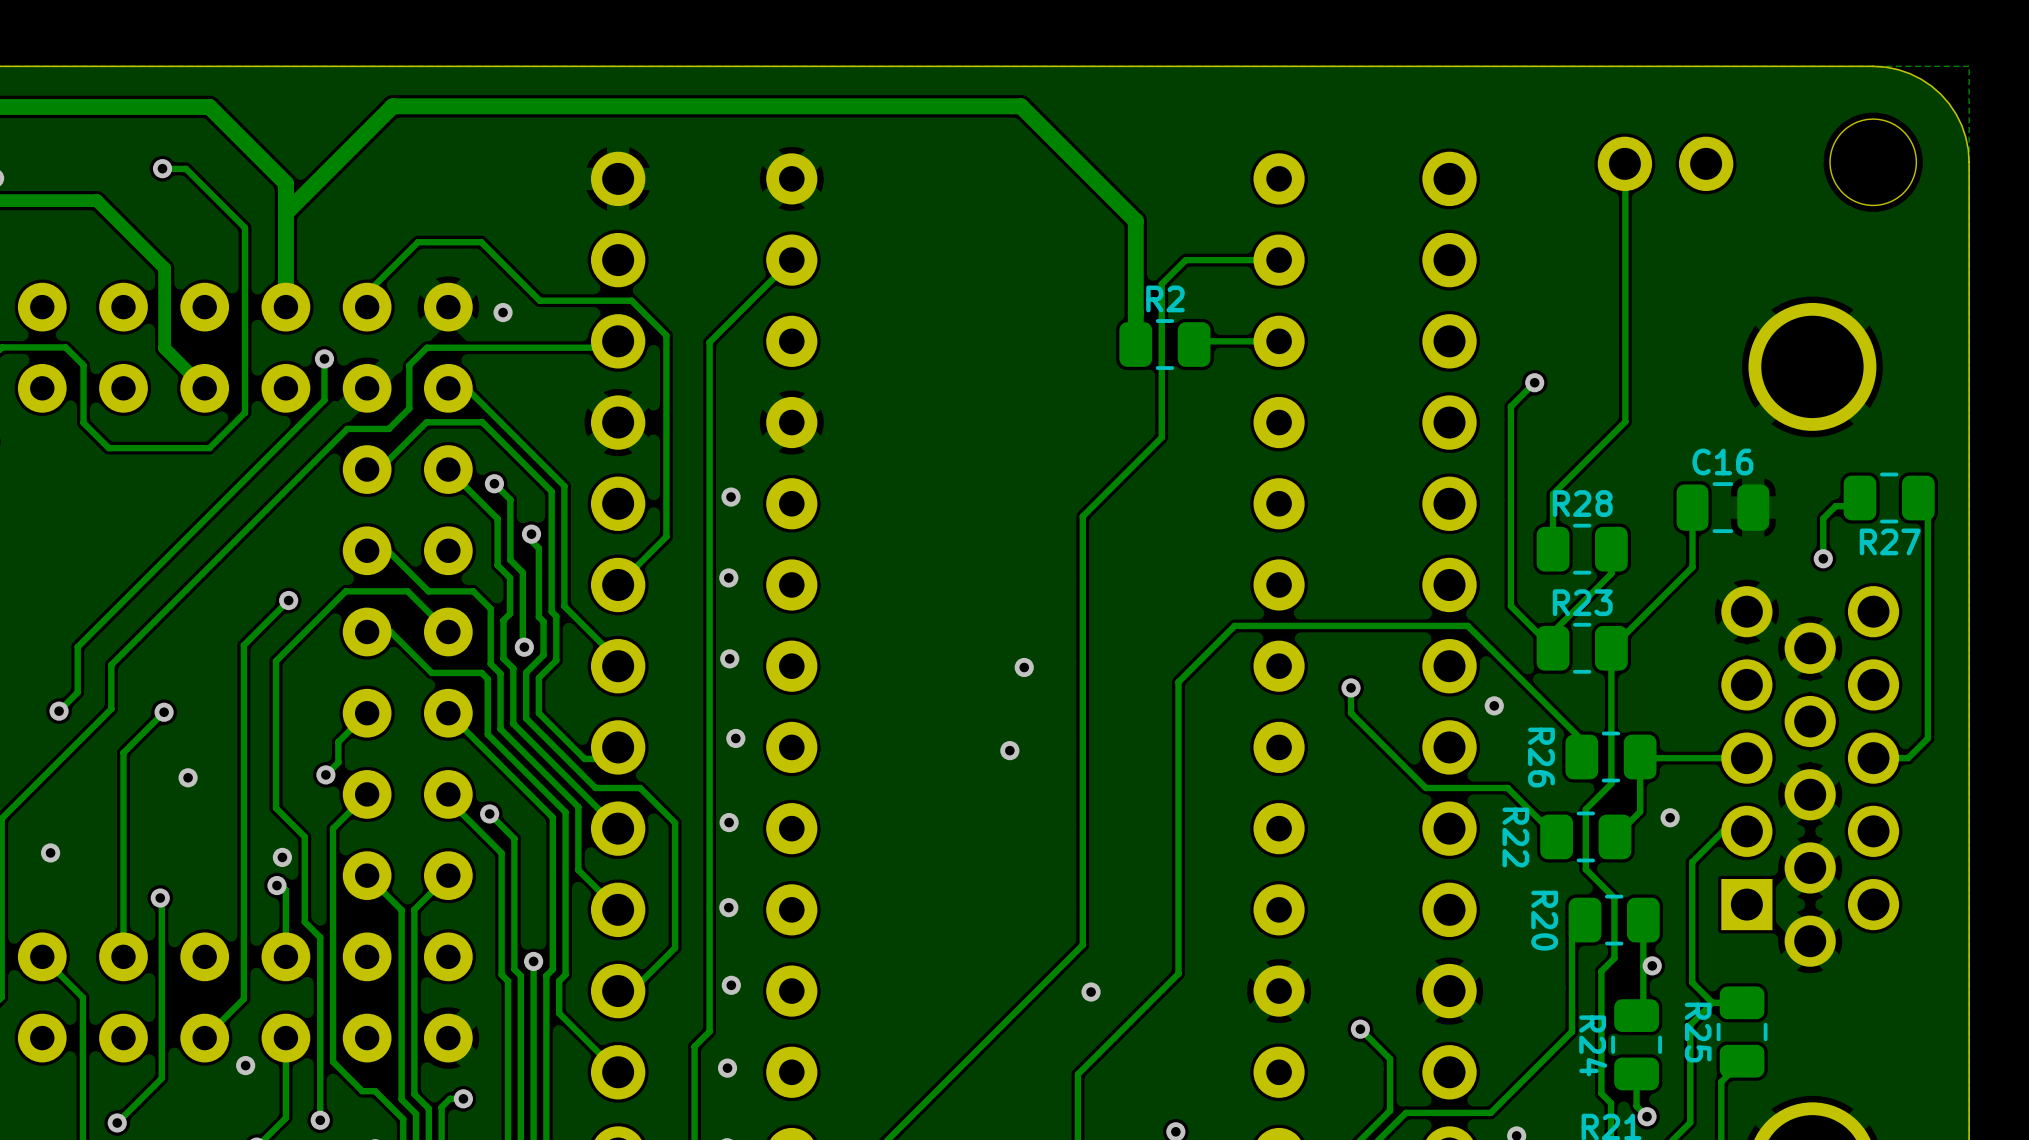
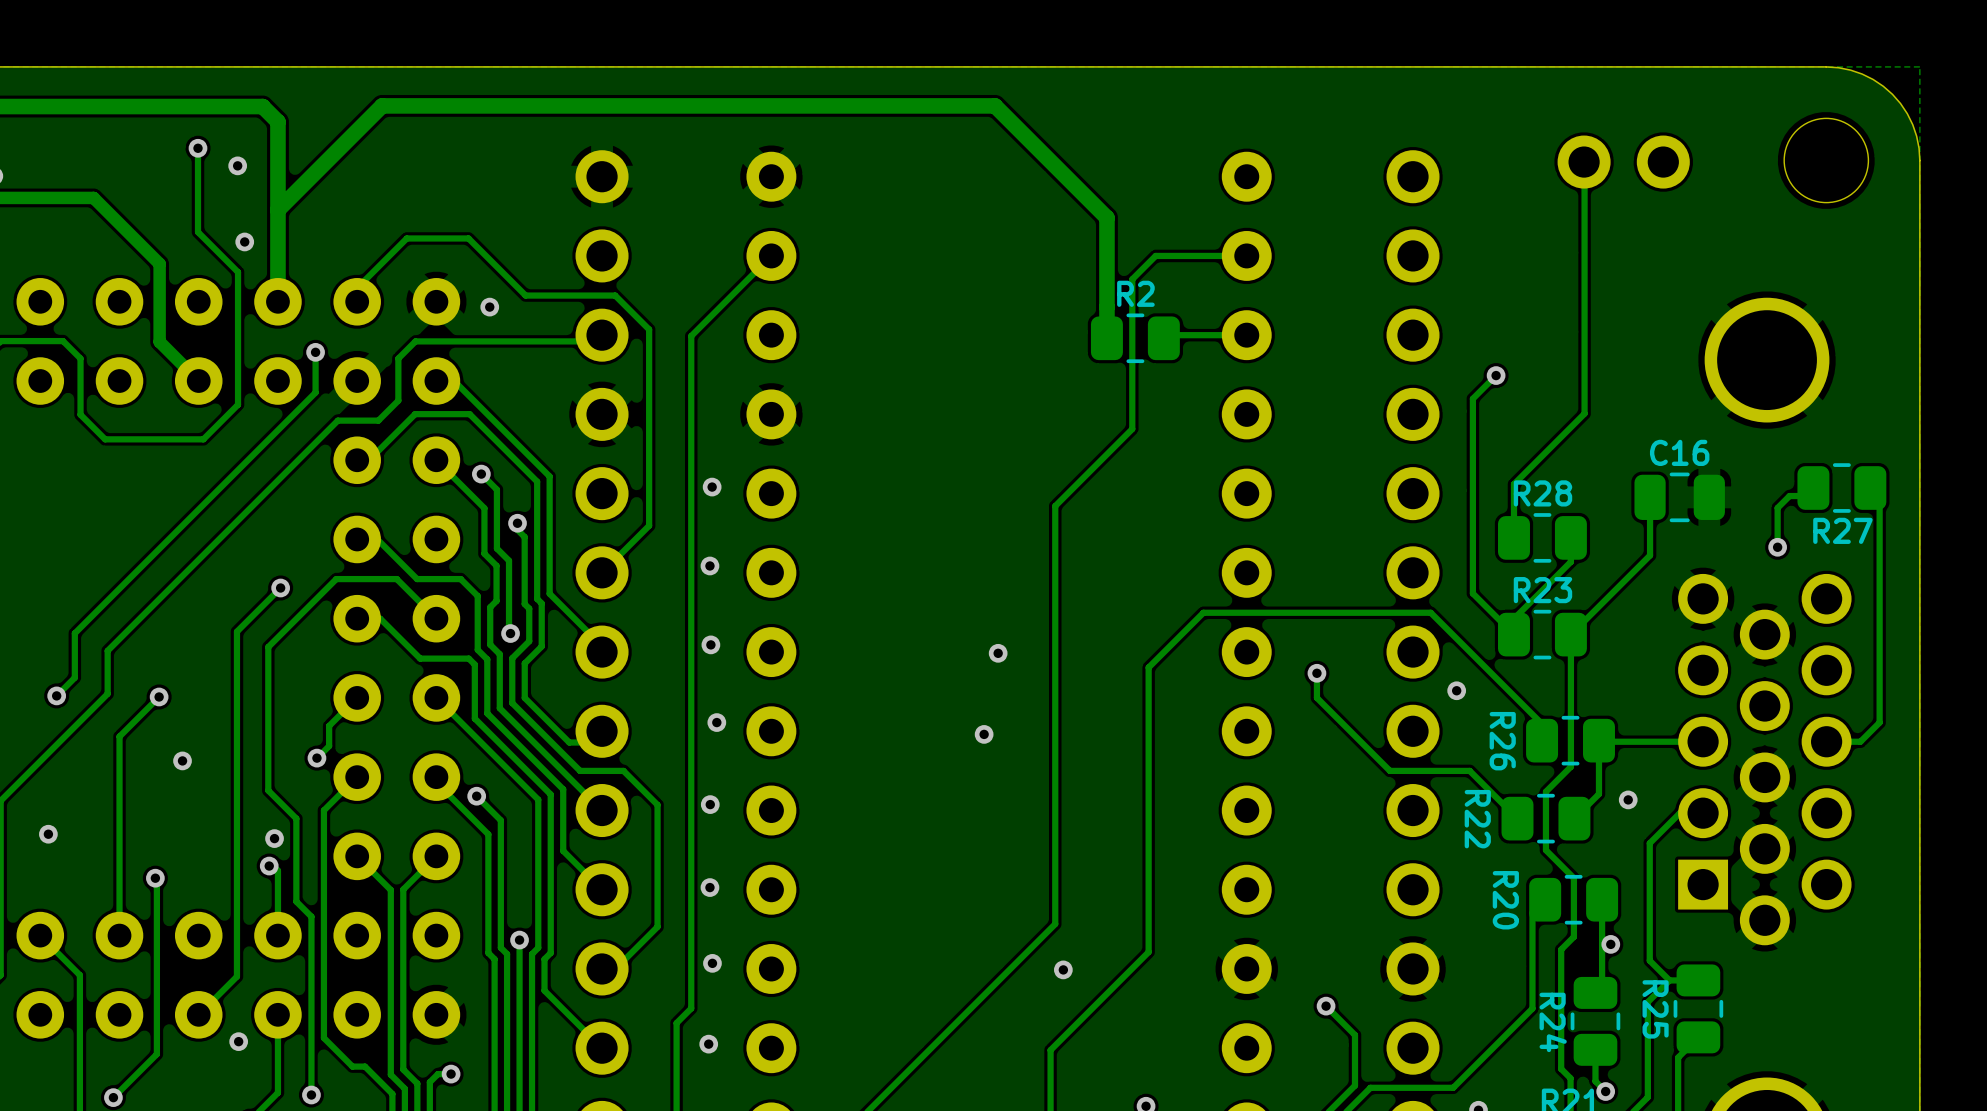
track: (209, 106) (285, 183) -> (203, 106) (262, 106) (277, 121) (277, 181)
via: none -> (198, 148)
via: none -> (237, 165)
track: (162, 168) (186, 168) (245, 227) (245, 276) -> (198, 148) (198, 232) (238, 272)
via: (162, 168) -> none
via: none -> (244, 241)

